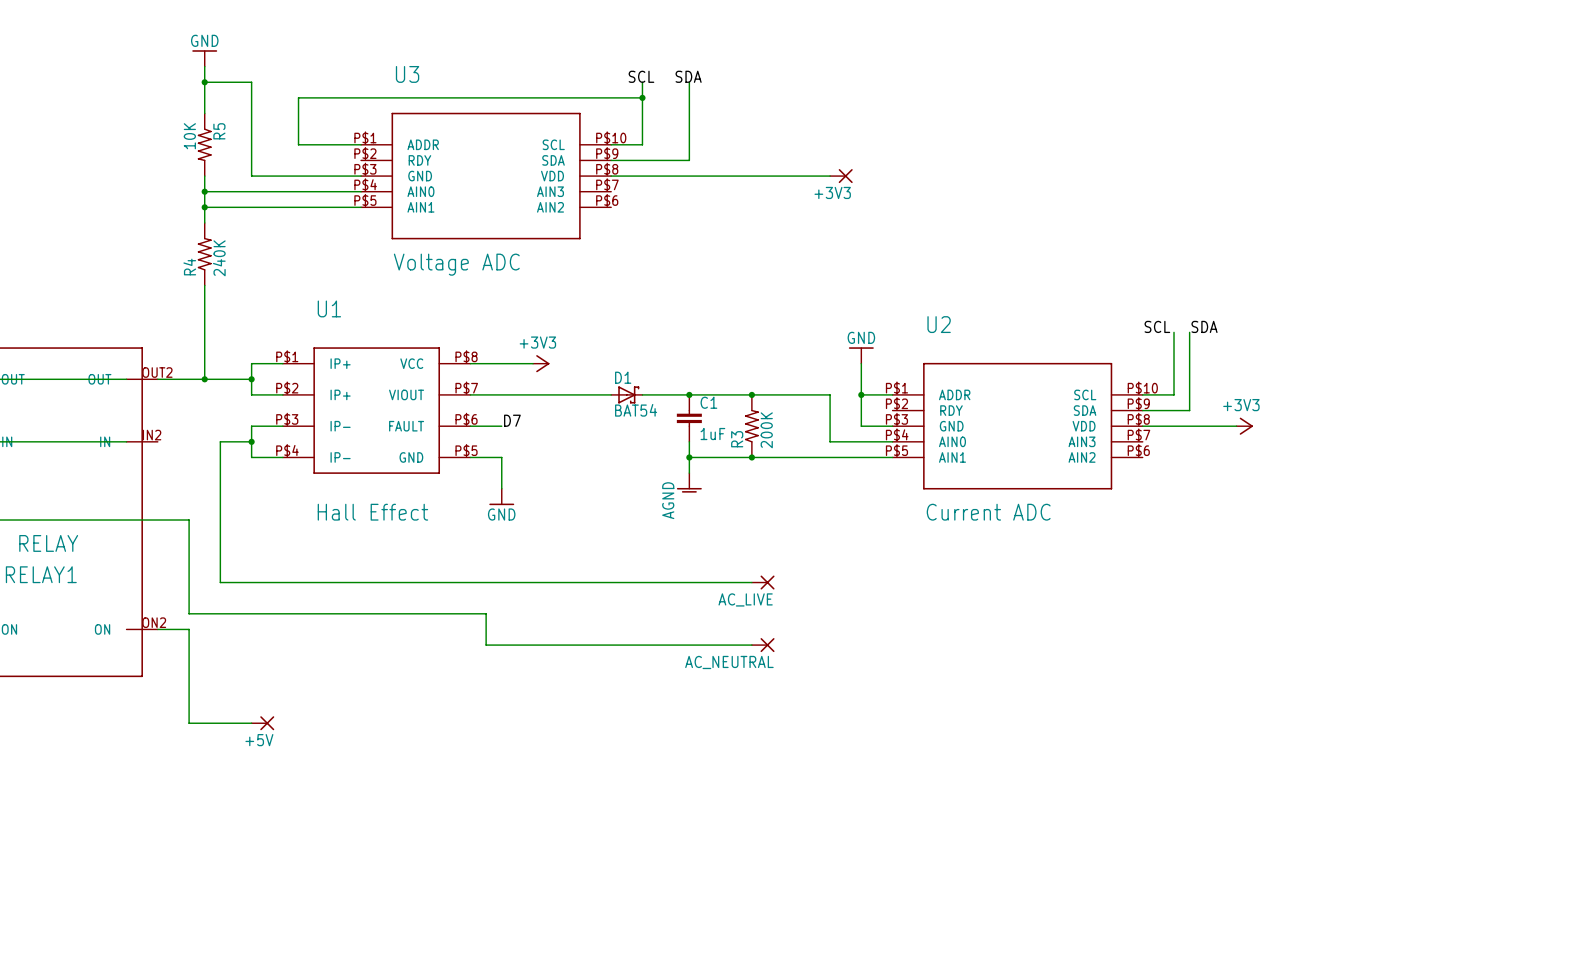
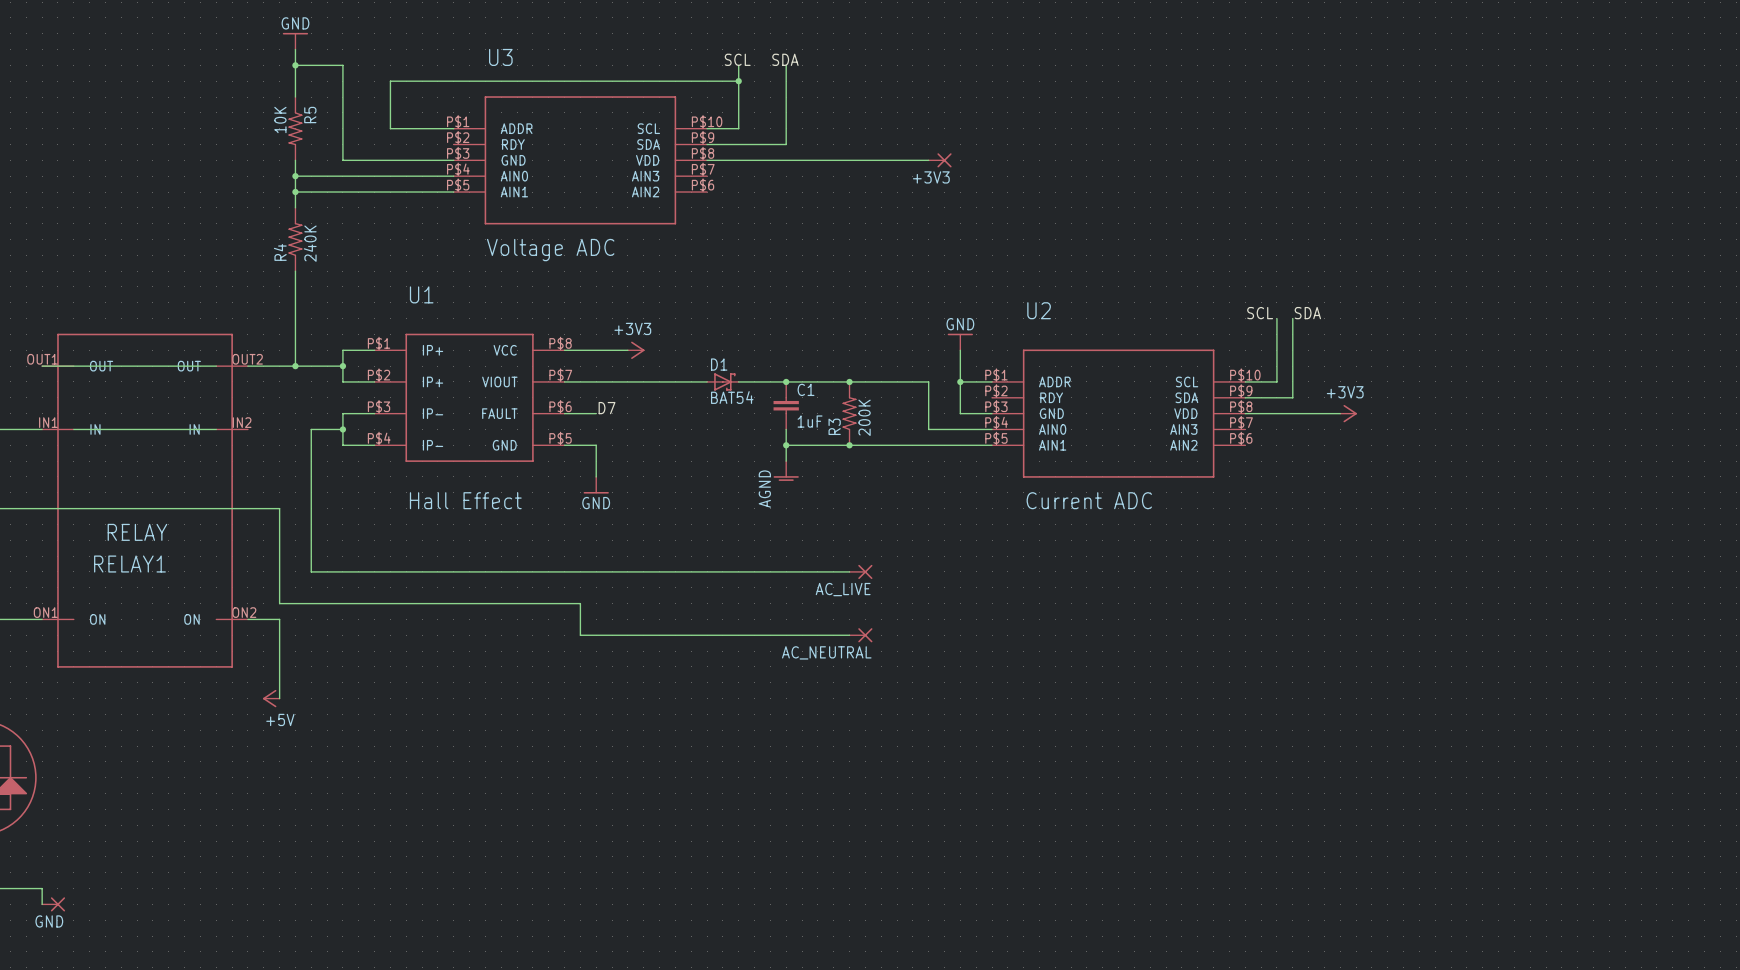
power symbol: none -> +5V (271, 698)
wire: (189, 707) (189, 723) (251, 723) -> none
+5V: (262, 723) -> none

